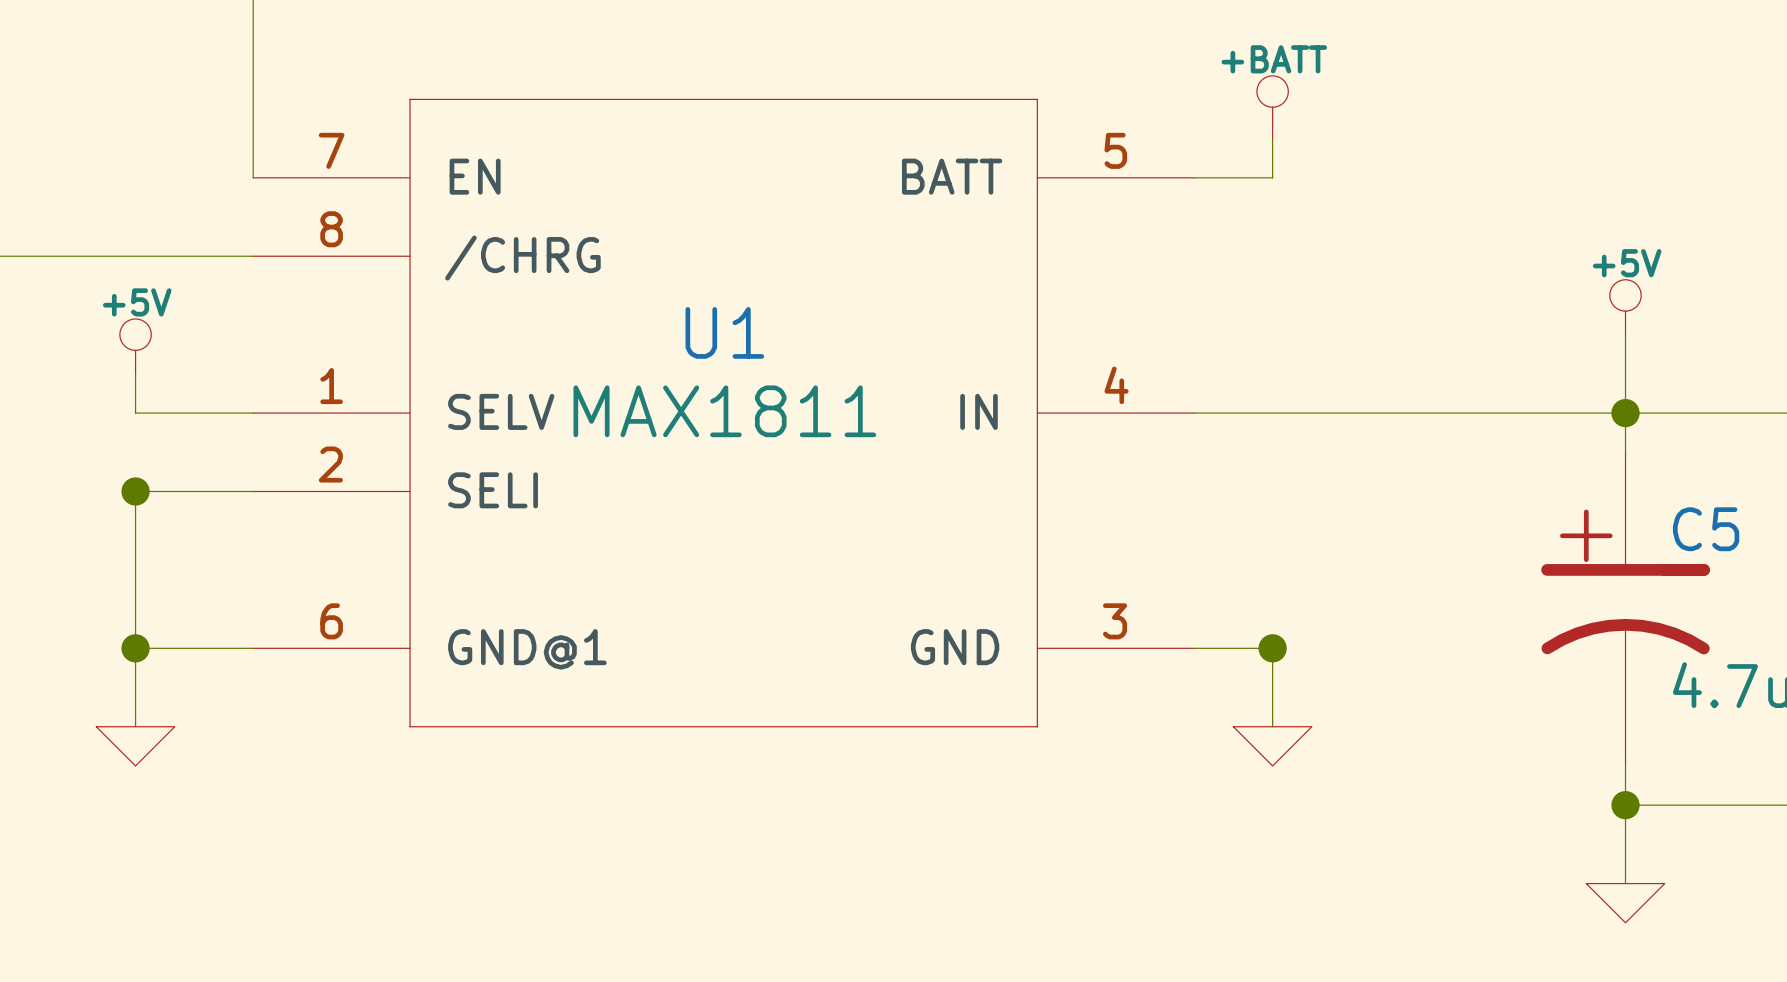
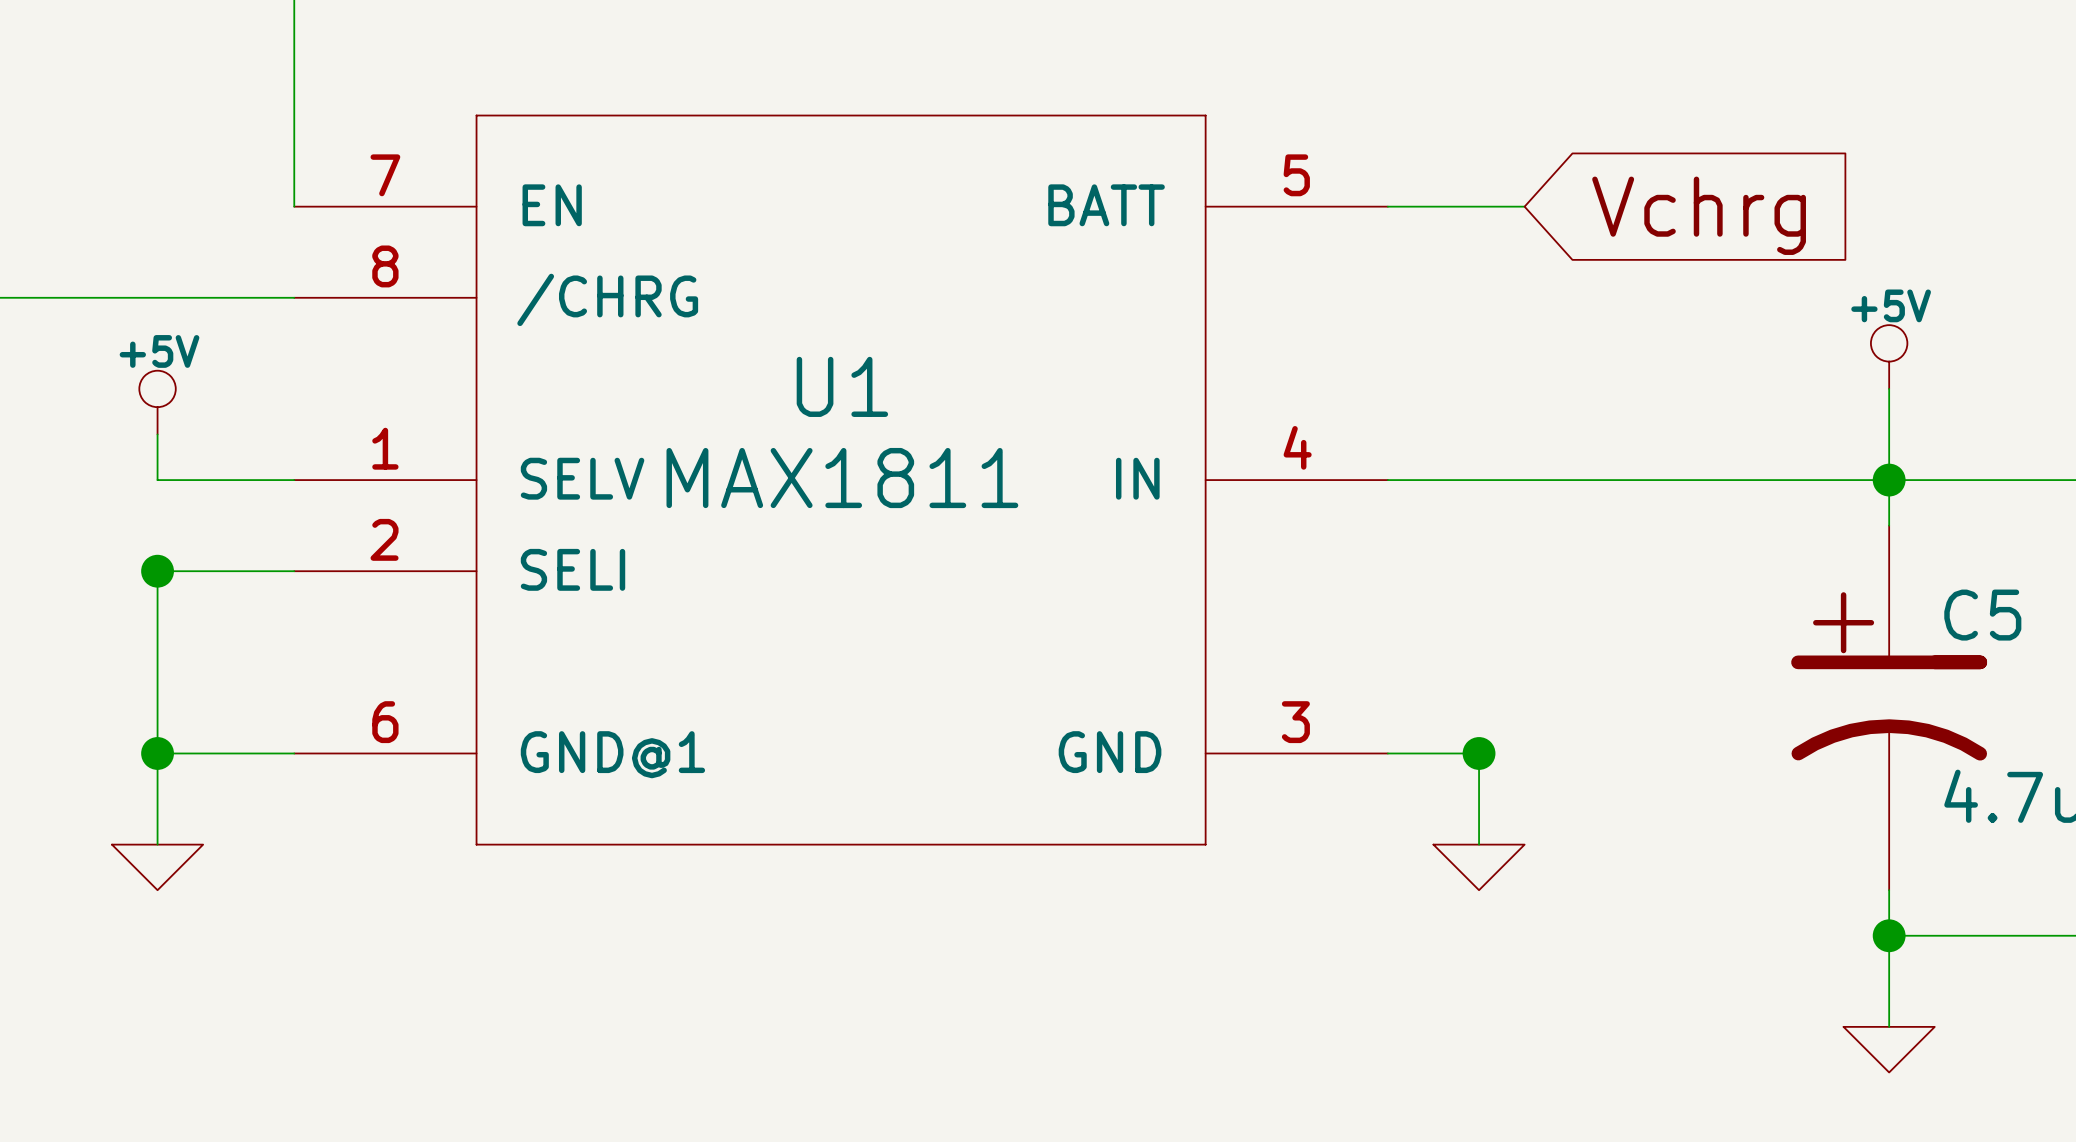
power symbol: +BATT (1272, 107) -> none
wire: (1272, 138) (1272, 177) -> (1524, 206) (1479, 206)
global label: none -> Vchrg (1699, 215)

